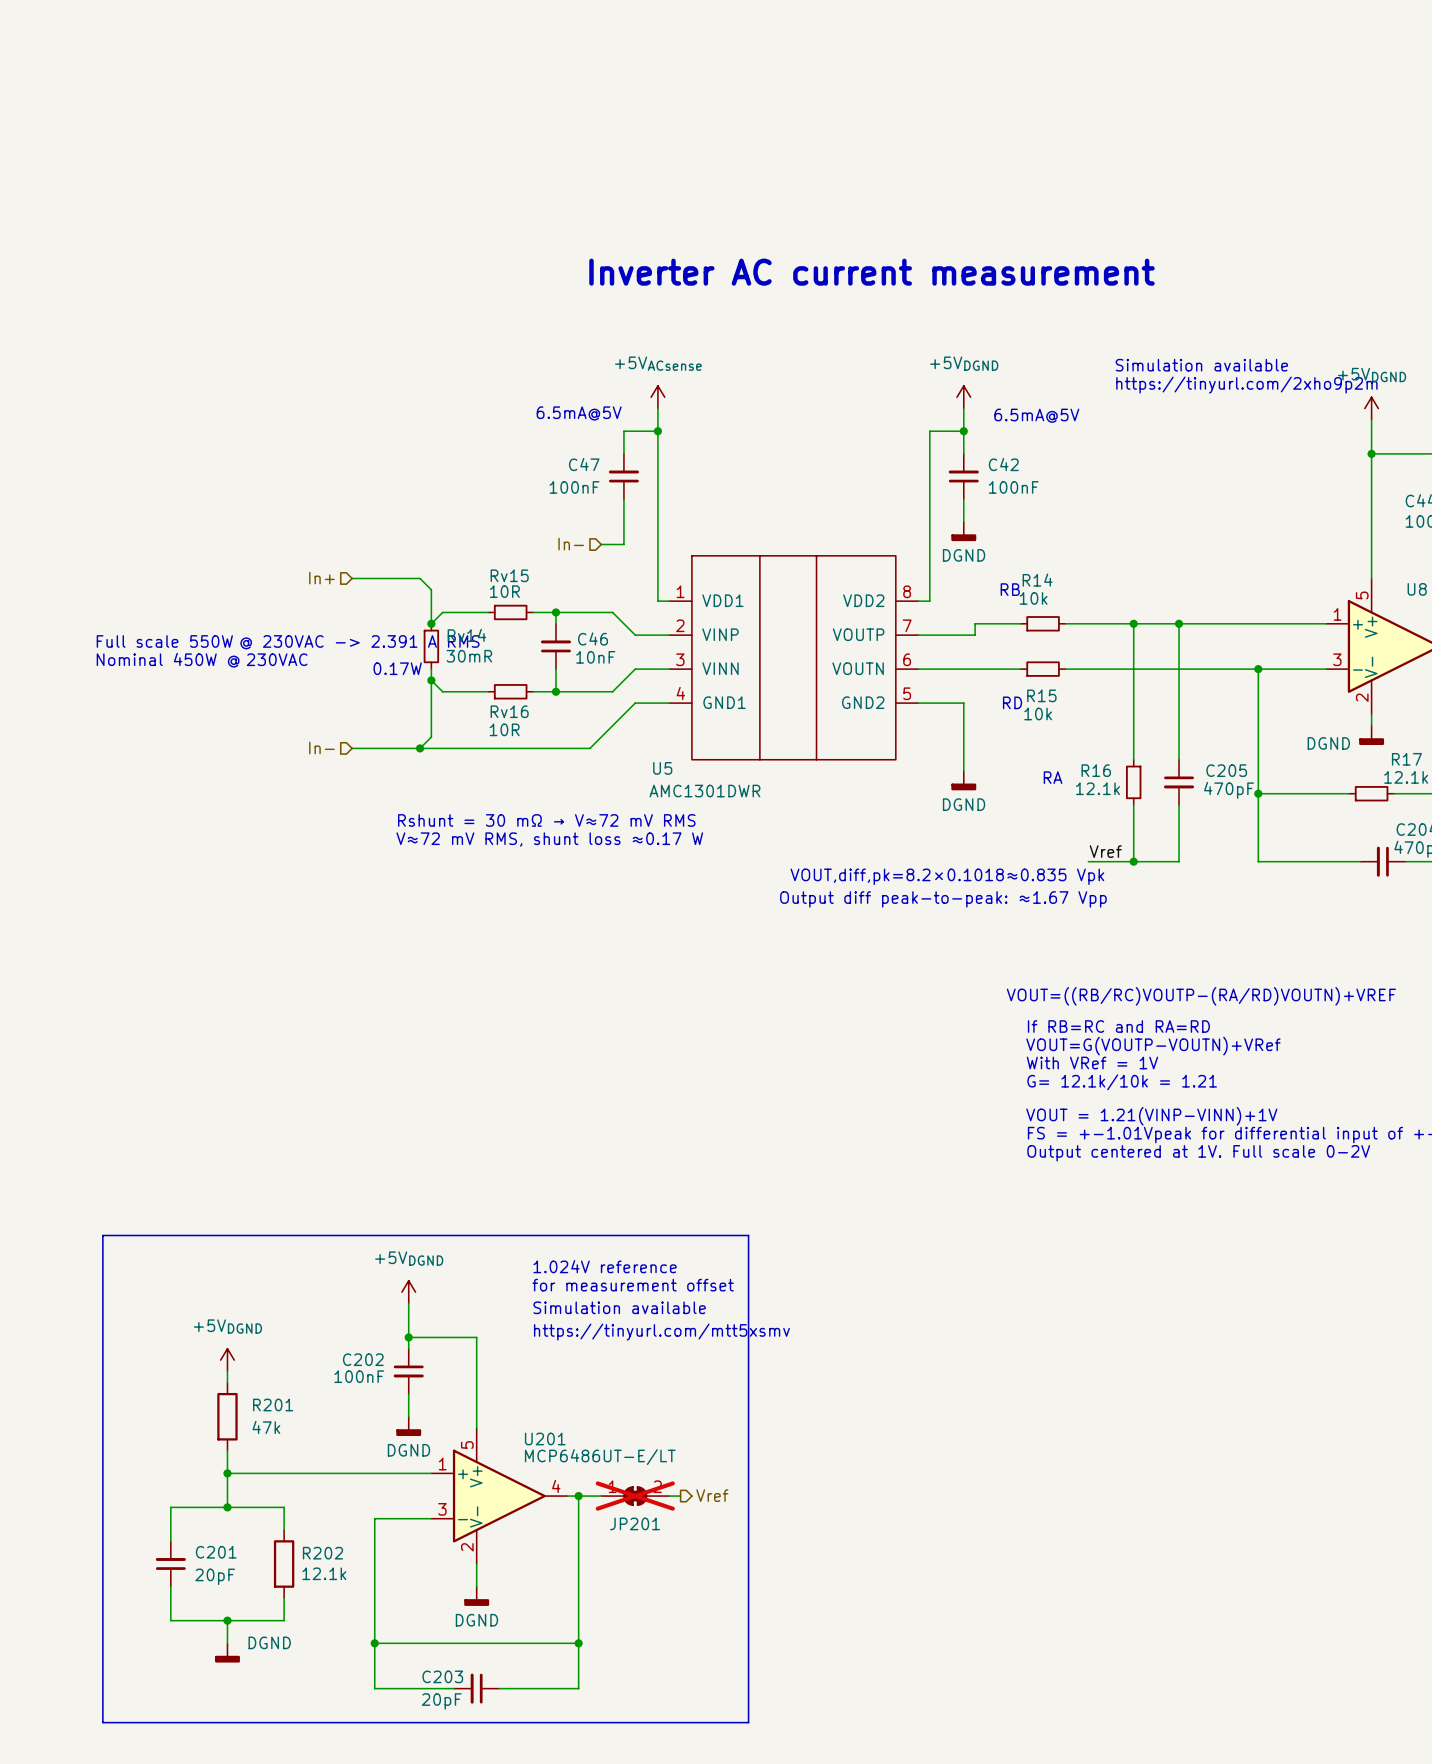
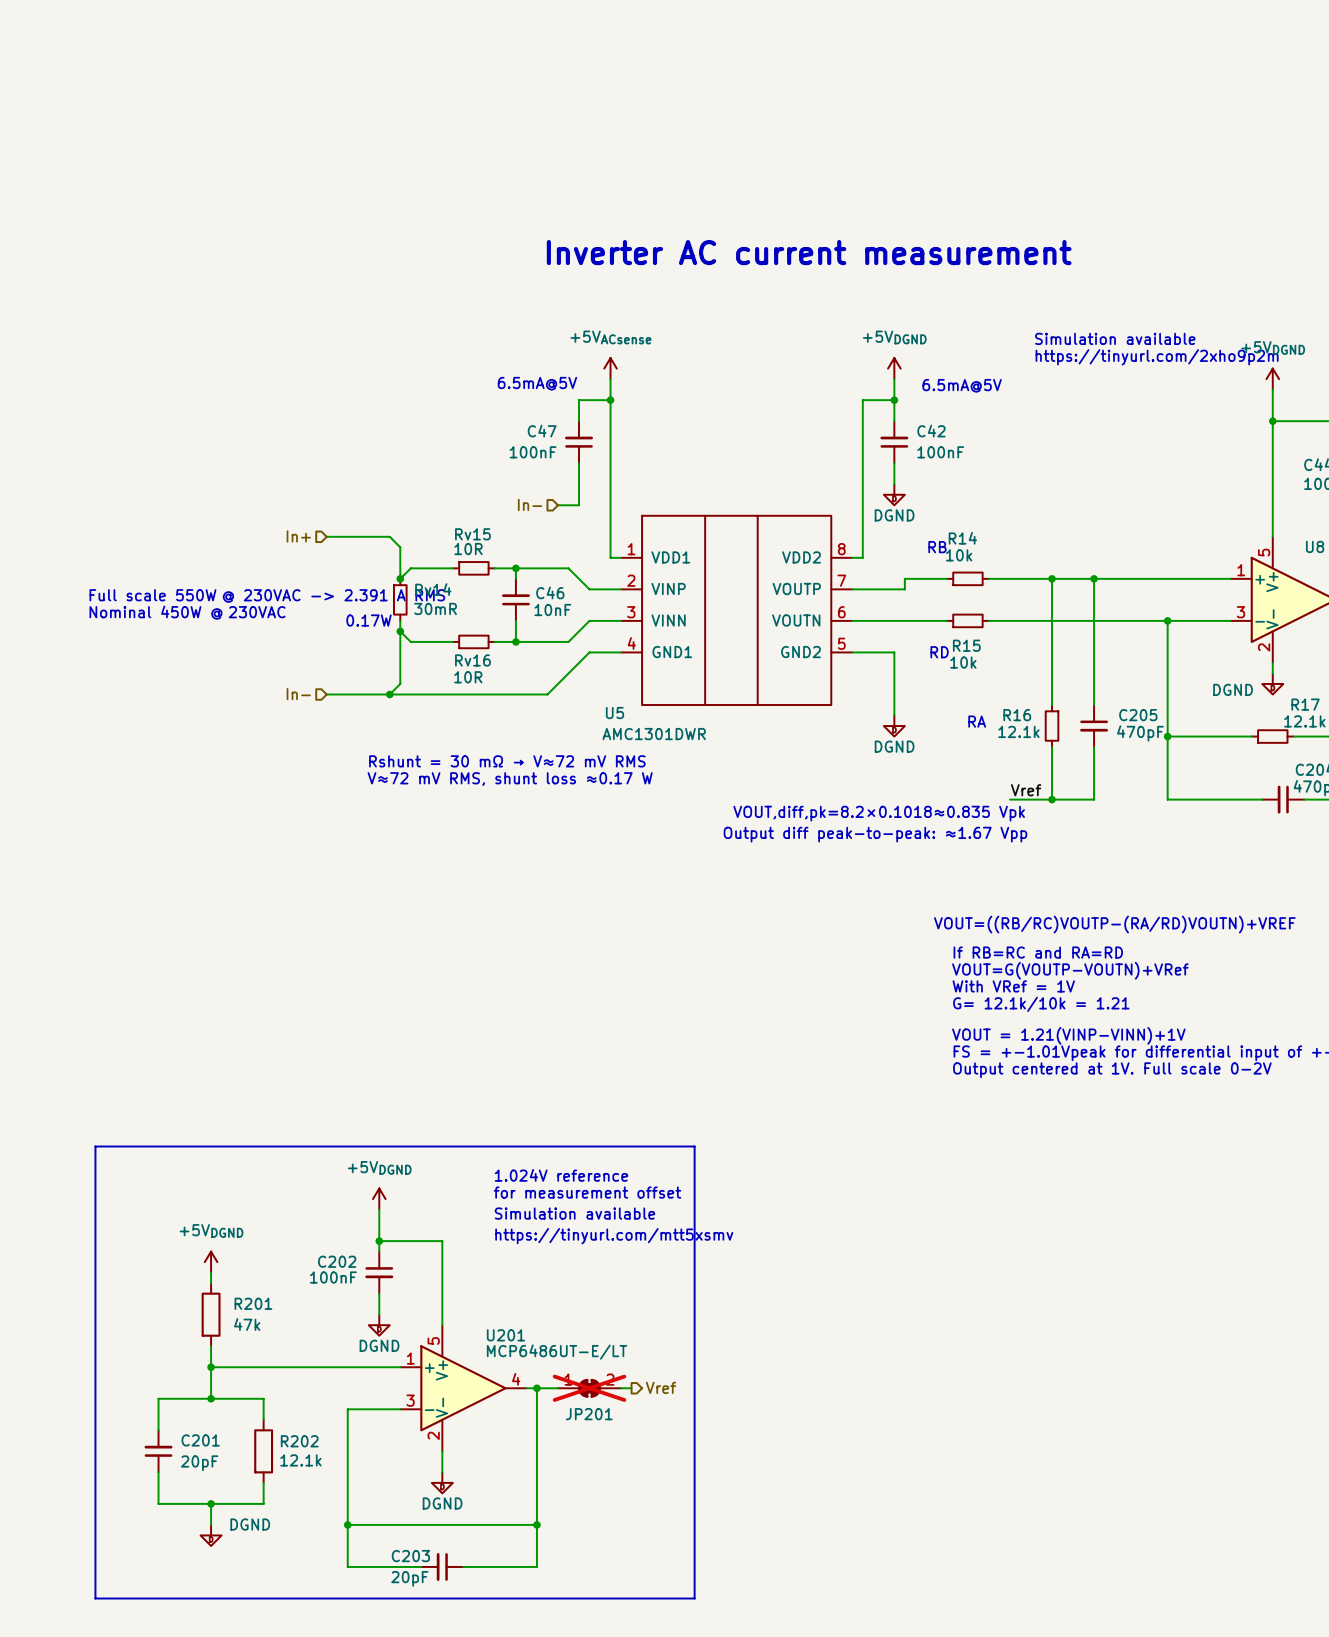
power symbol shape: [951, 521, 977, 542] -> [883, 484, 905, 506]
power symbol shape: [1359, 725, 1385, 746] -> [1262, 673, 1284, 695]
power symbol shape: [951, 771, 977, 791] -> [883, 715, 905, 737]
power symbol shape: [396, 1416, 422, 1437] -> [368, 1314, 390, 1336]
power symbol shape: [464, 1586, 490, 1606] -> [431, 1472, 453, 1494]
power symbol shape: [215, 1643, 240, 1663] -> [200, 1524, 222, 1546]

